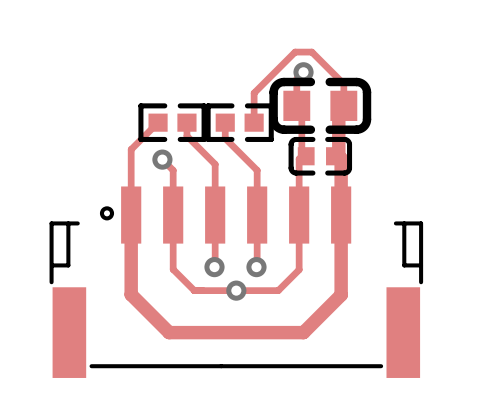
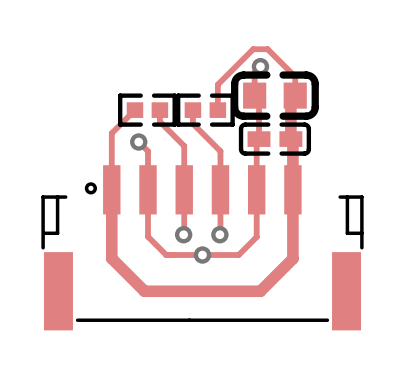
part footprint: [288, 136, 353, 176] -> [238, 122, 312, 156]

